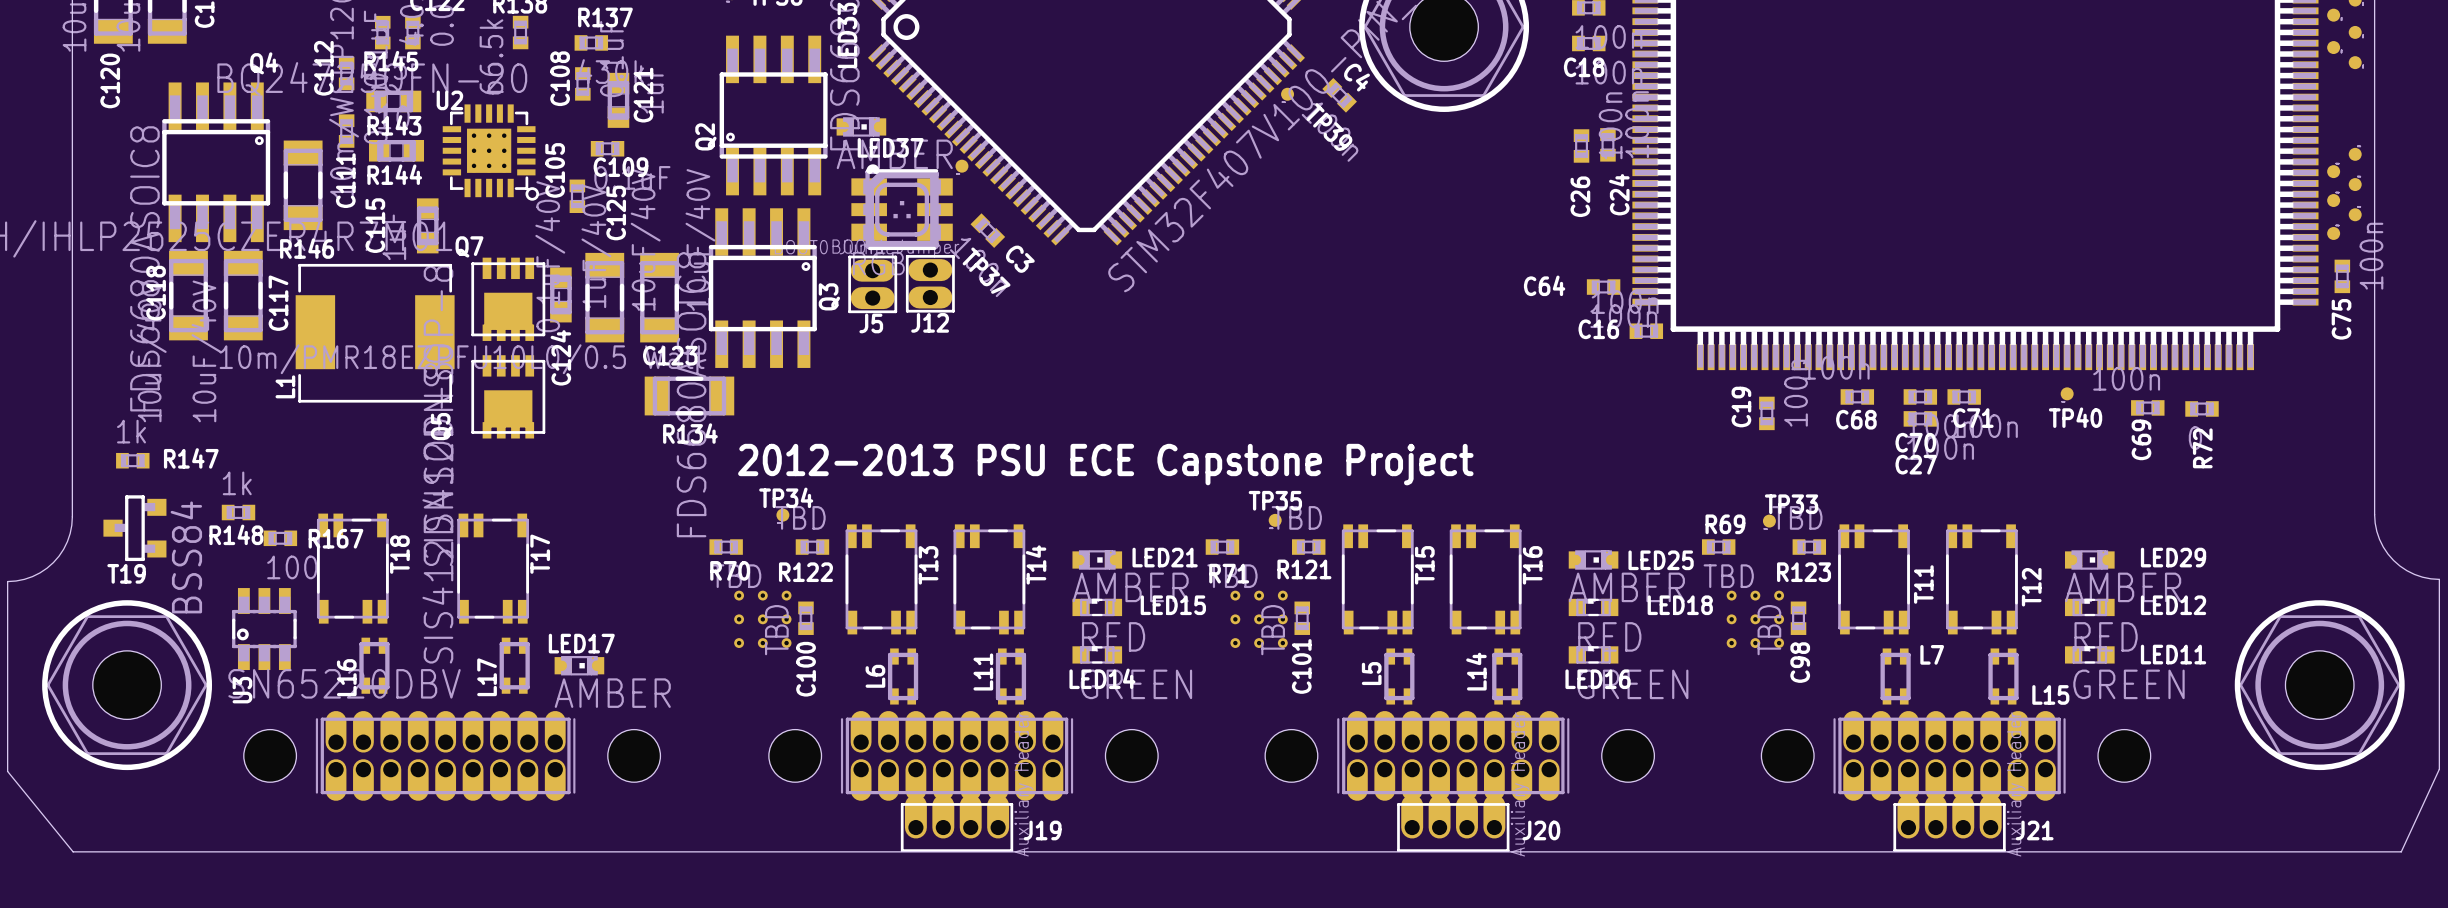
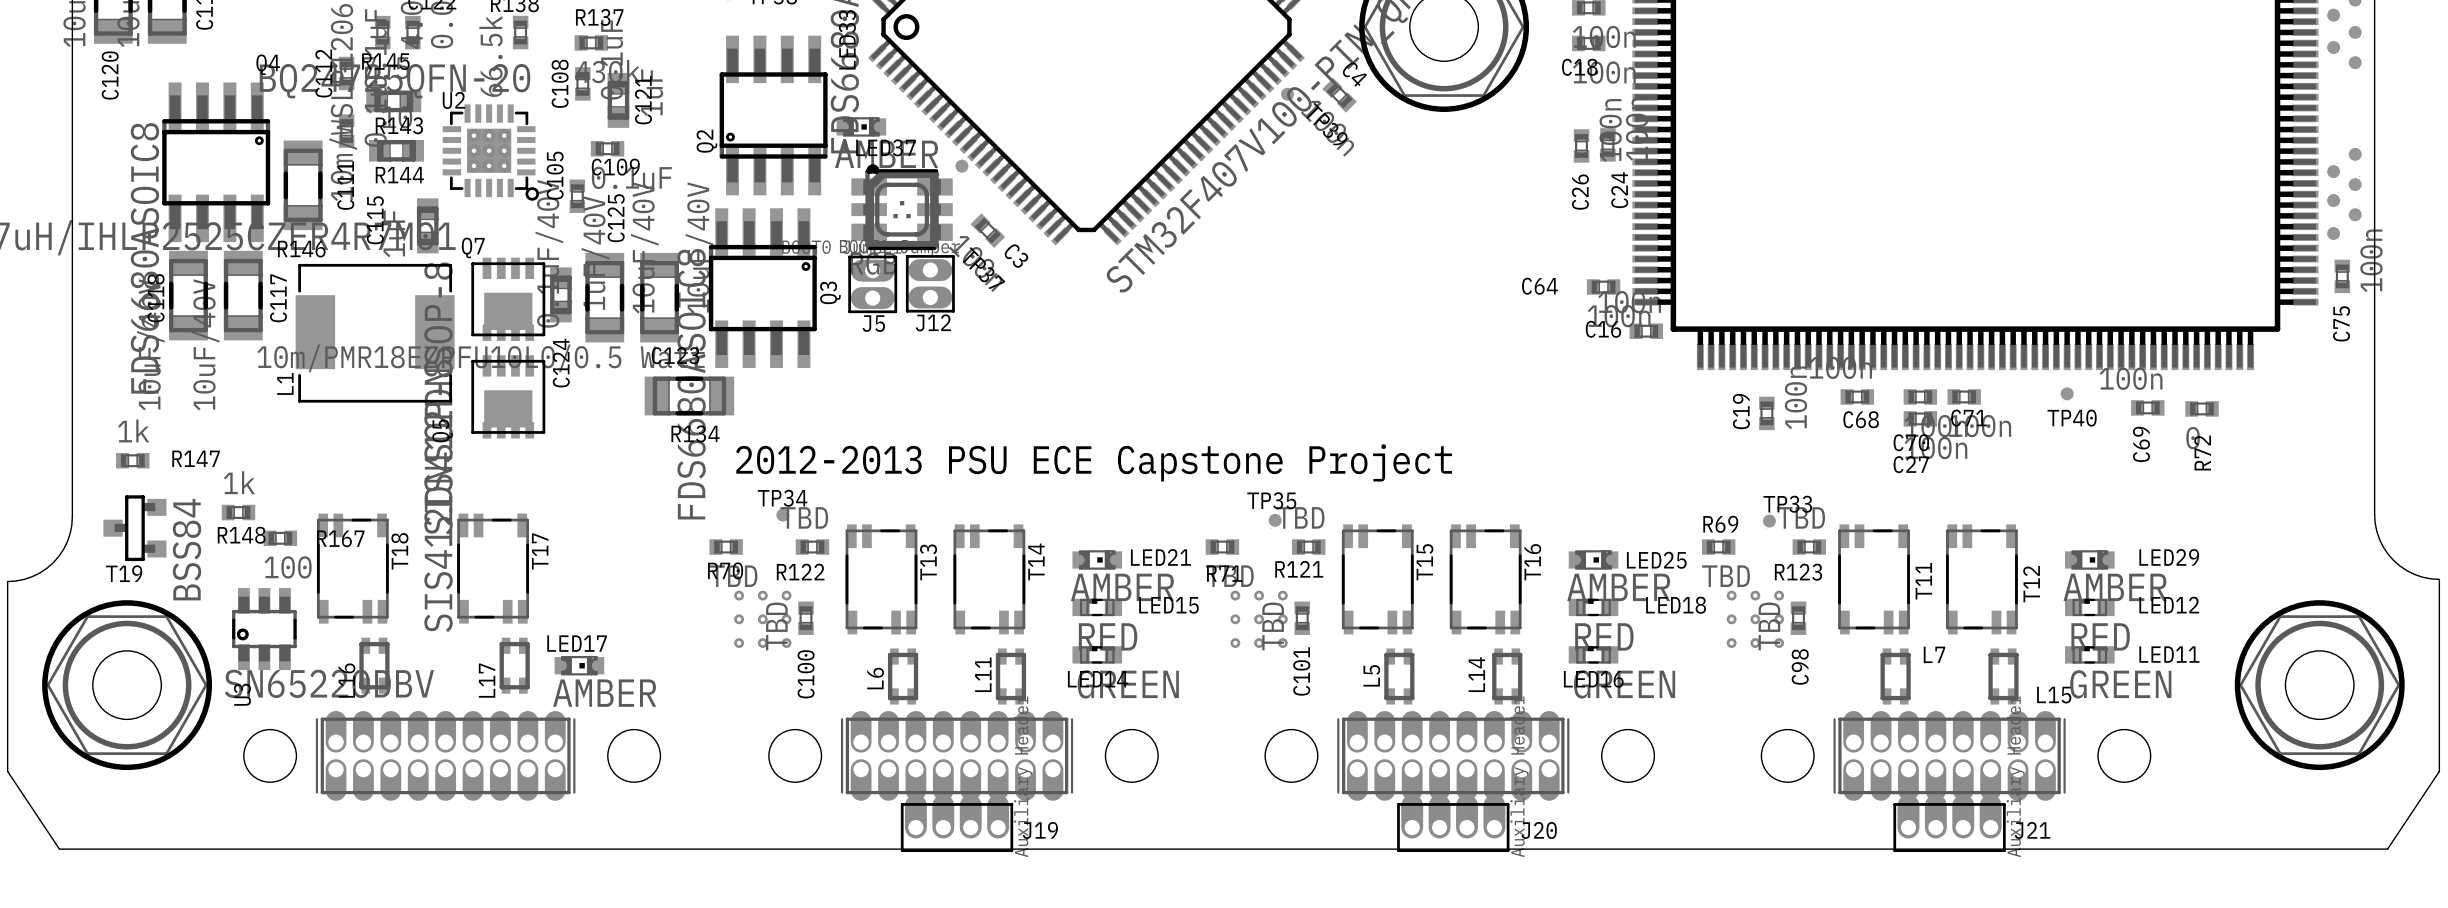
board edge: (2439, 769) (2401, 851) (73, 851) (7, 771) -> (2439, 769) (2387, 849) (59, 849) (7, 771)

